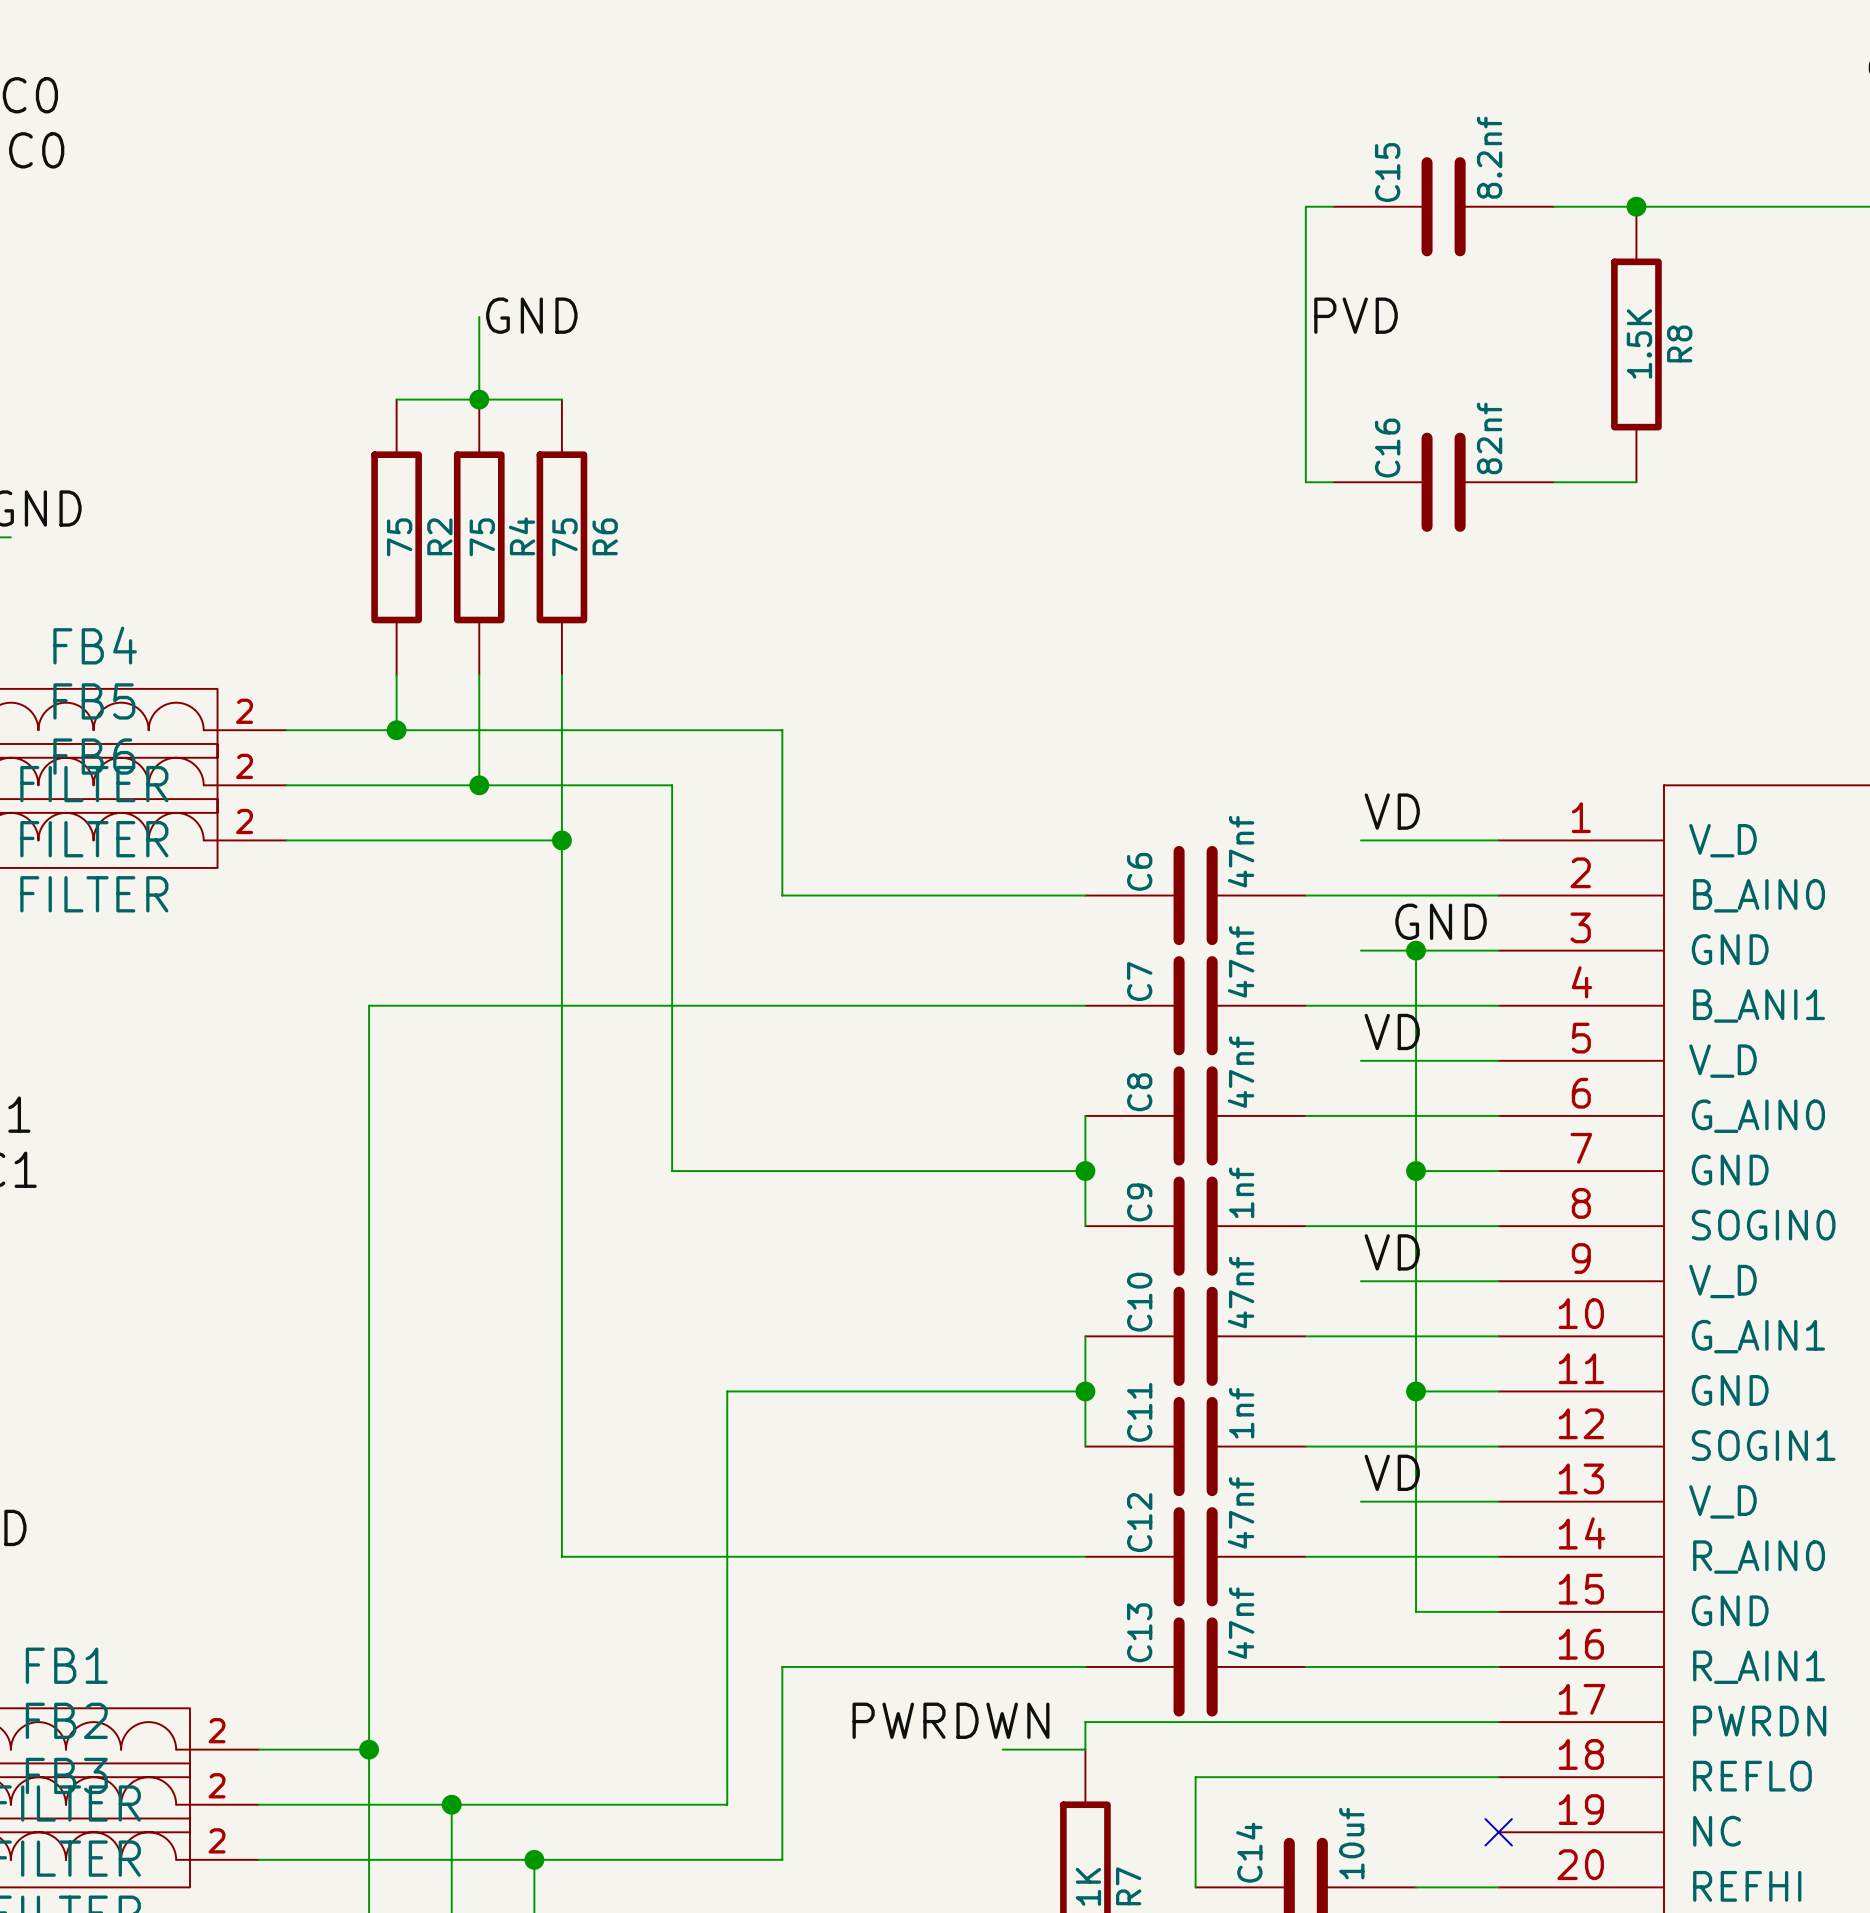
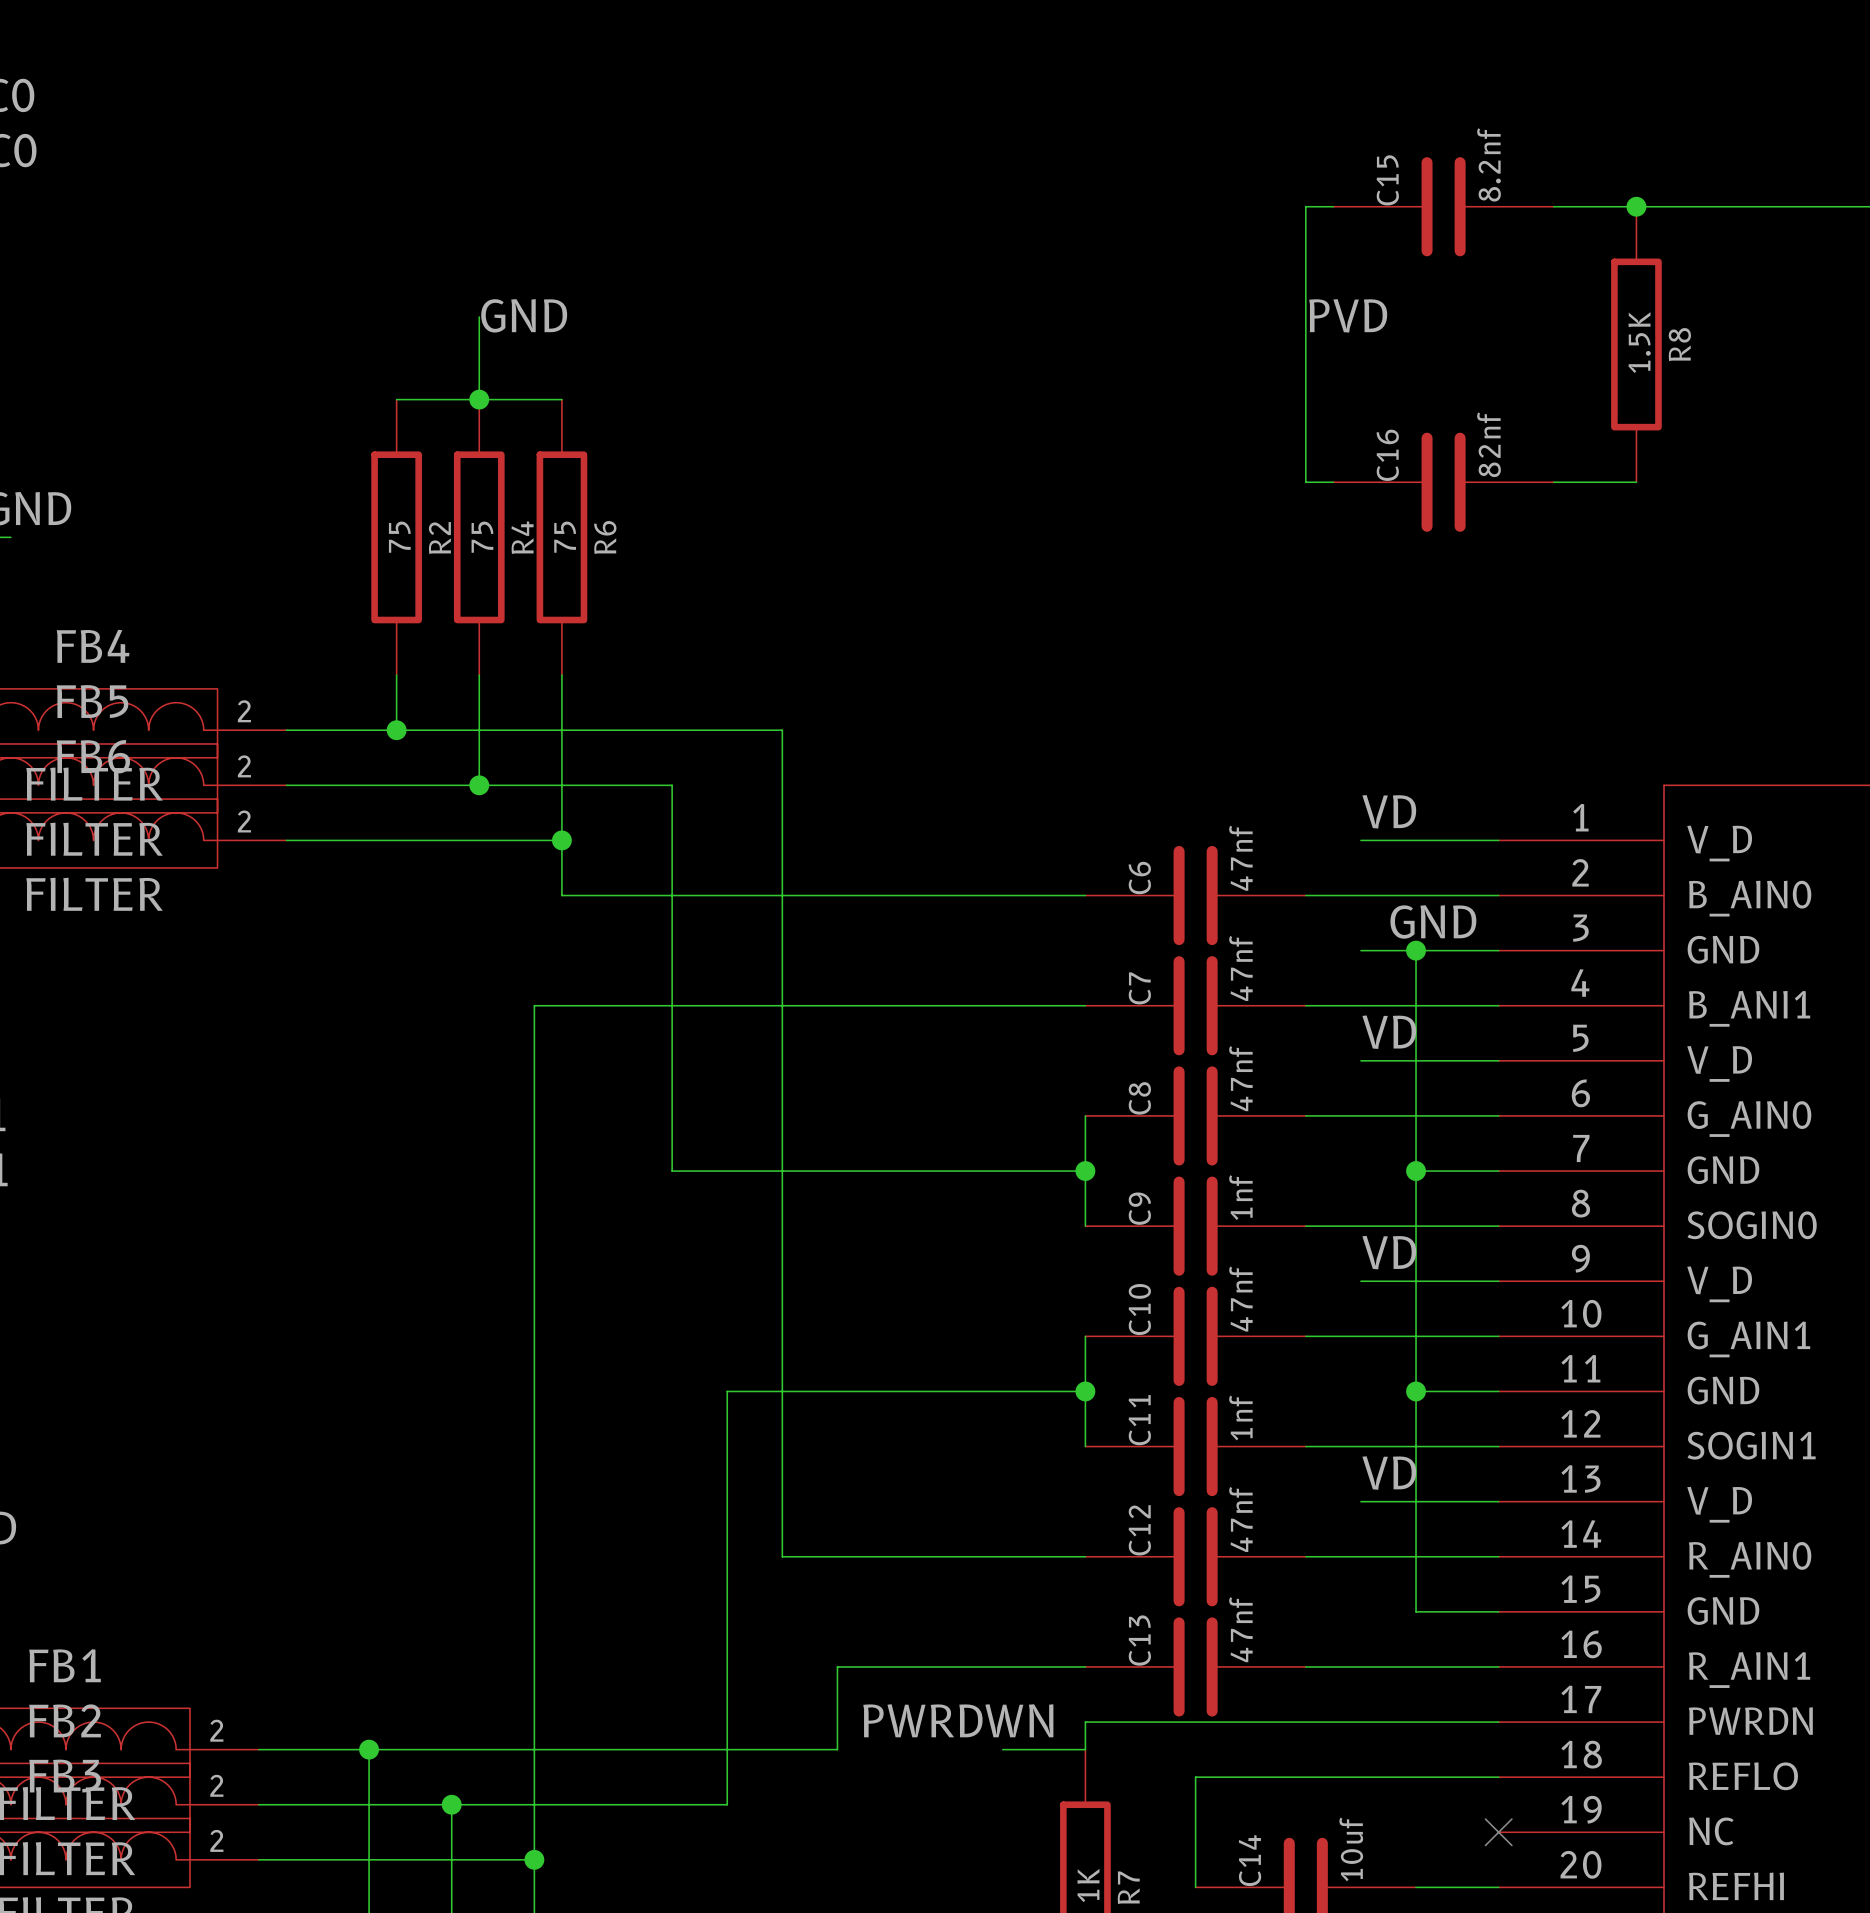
wire: (561, 895) (561, 1556) (782, 1556) -> (561, 895) (782, 895) (782, 1556)
wire: (534, 1005) (369, 1005) (369, 1749) -> (534, 1005) (534, 1859)
wire: (837, 1666) (782, 1666) (782, 1859) (534, 1859) -> (837, 1666) (837, 1749) (369, 1749)

